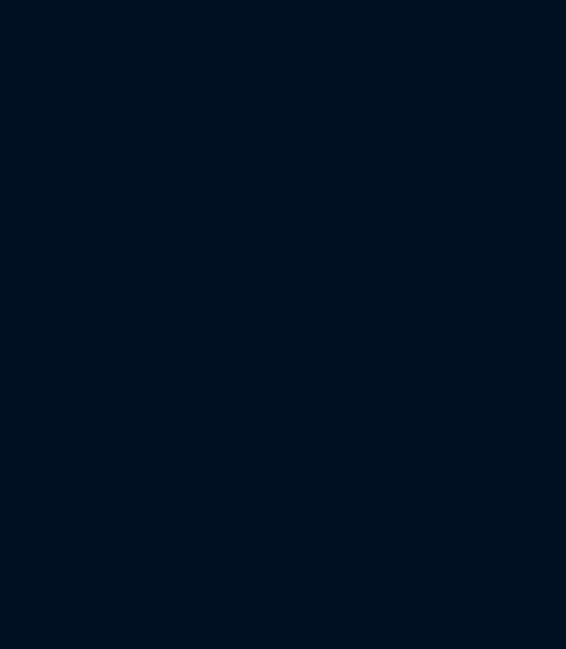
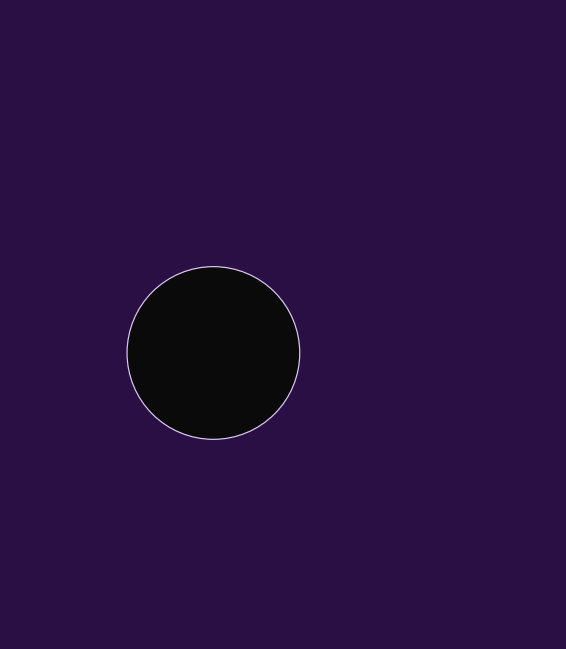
part: none -> (213, 352)

